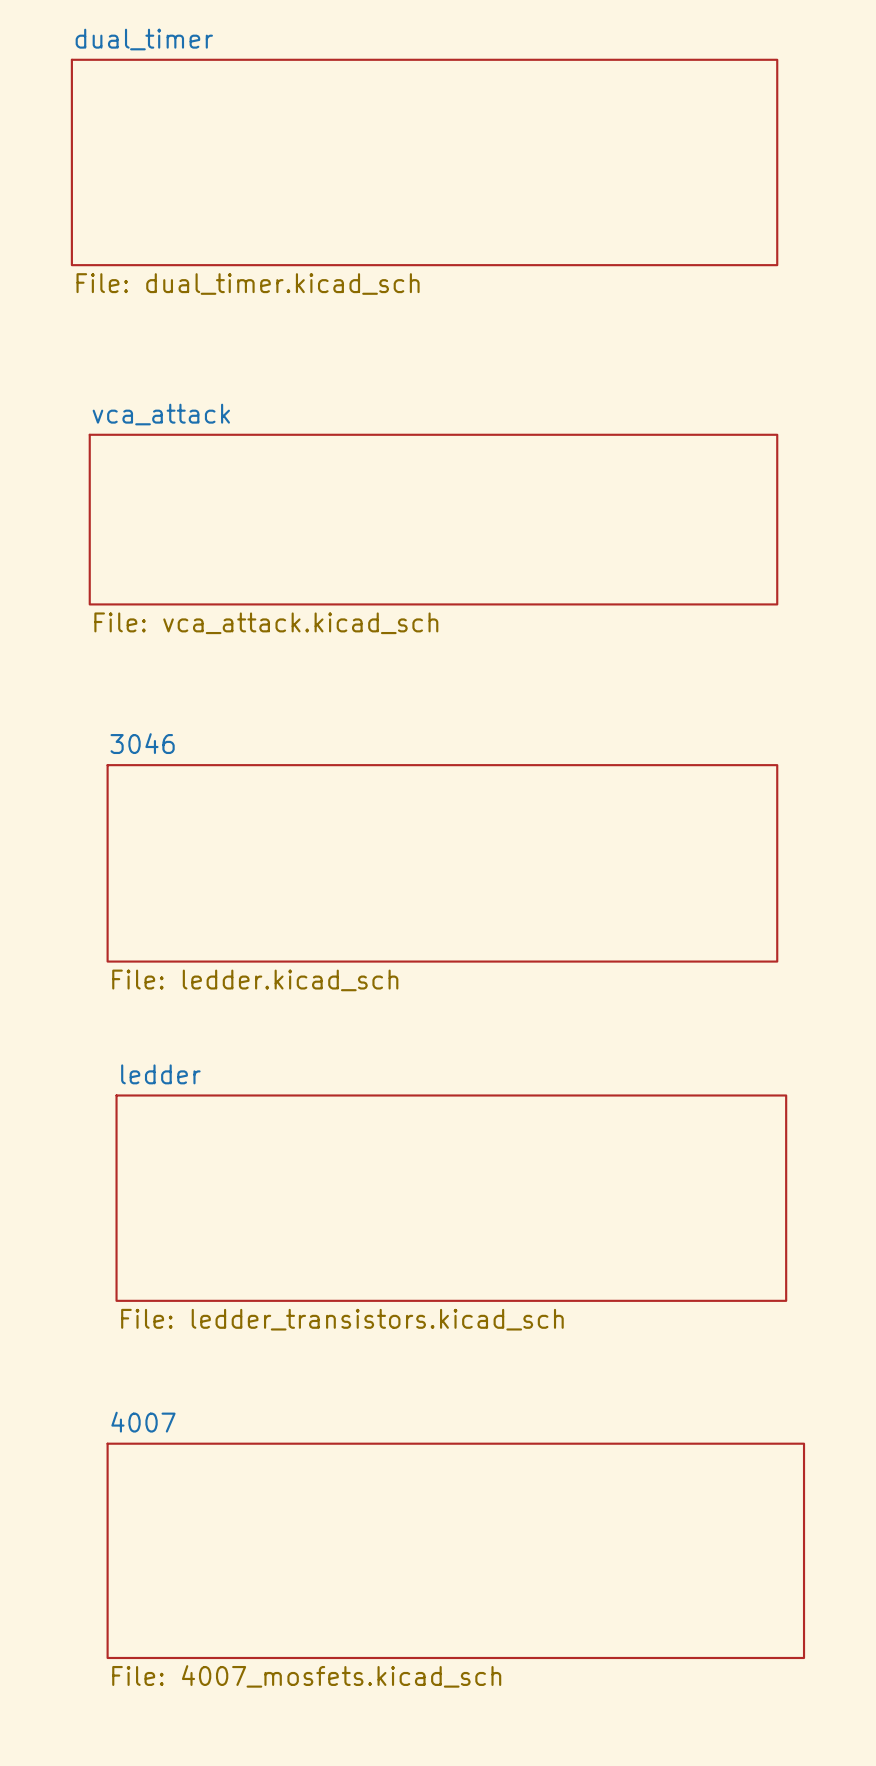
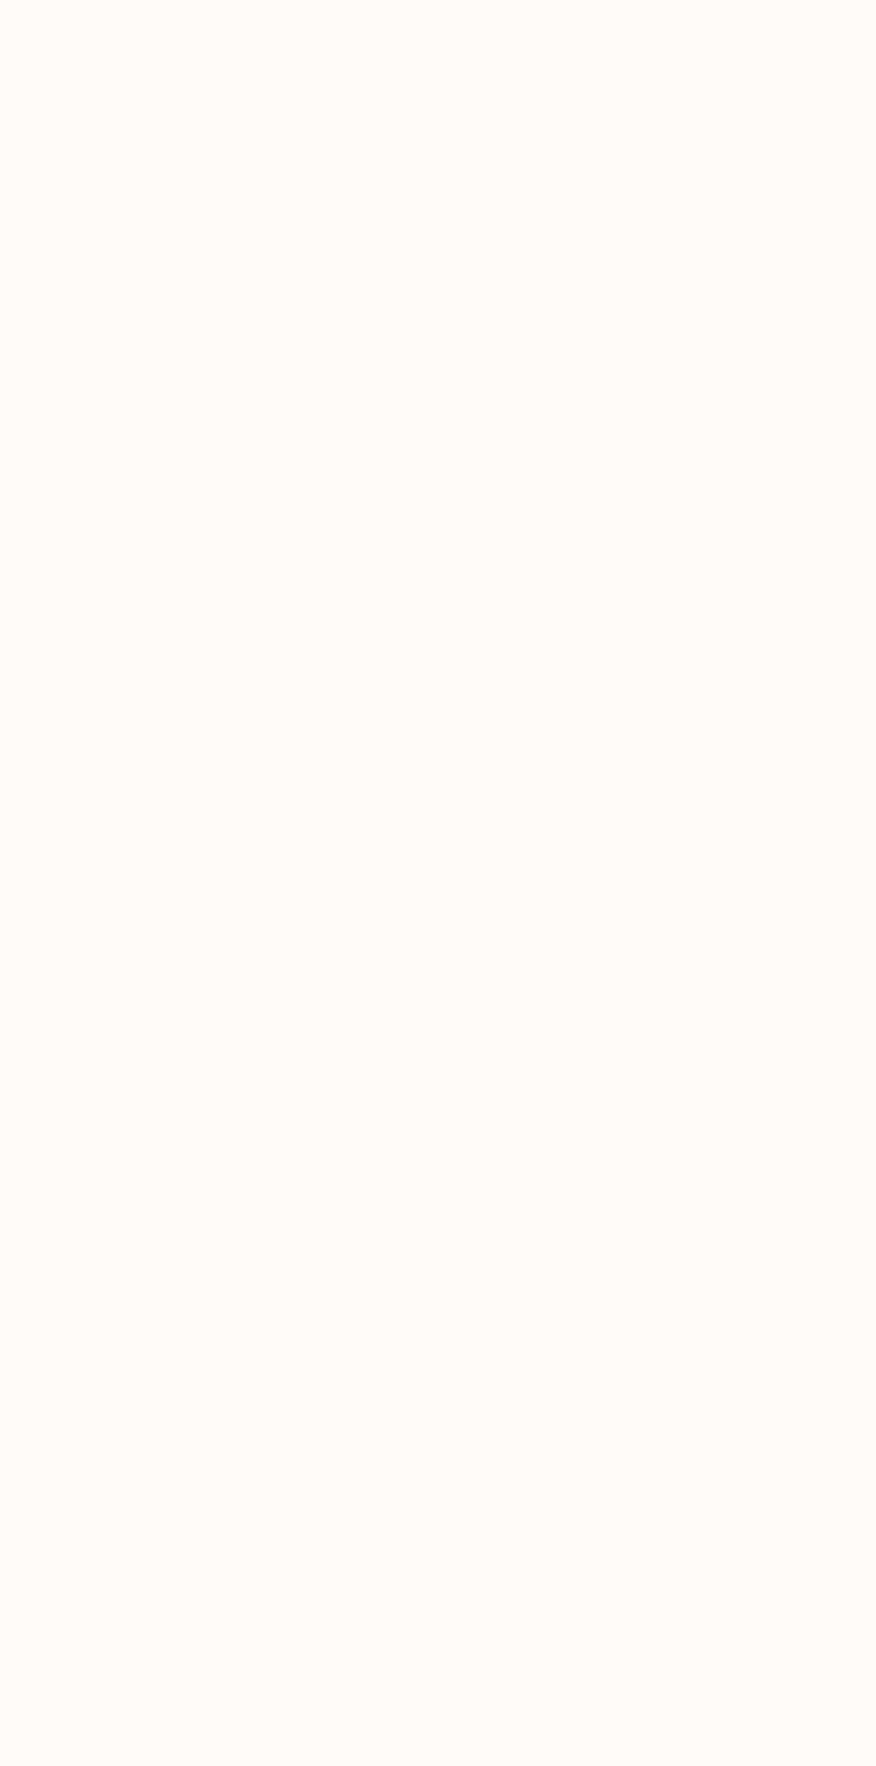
sheet dual_timer: File: dual_timer.kicad_sch (424, 162) -> none
sheet vca_attack: File: vca_attack.kicad_sch (433, 519) -> none
sheet 3046: File: ledder.kicad_sch (442, 863) -> none
sheet ledder: File: ledder_transistors.kicad_sch (451, 1198) -> none
sheet 4007: File: 4007_mosfets.kicad_sch (455, 1550) -> none

